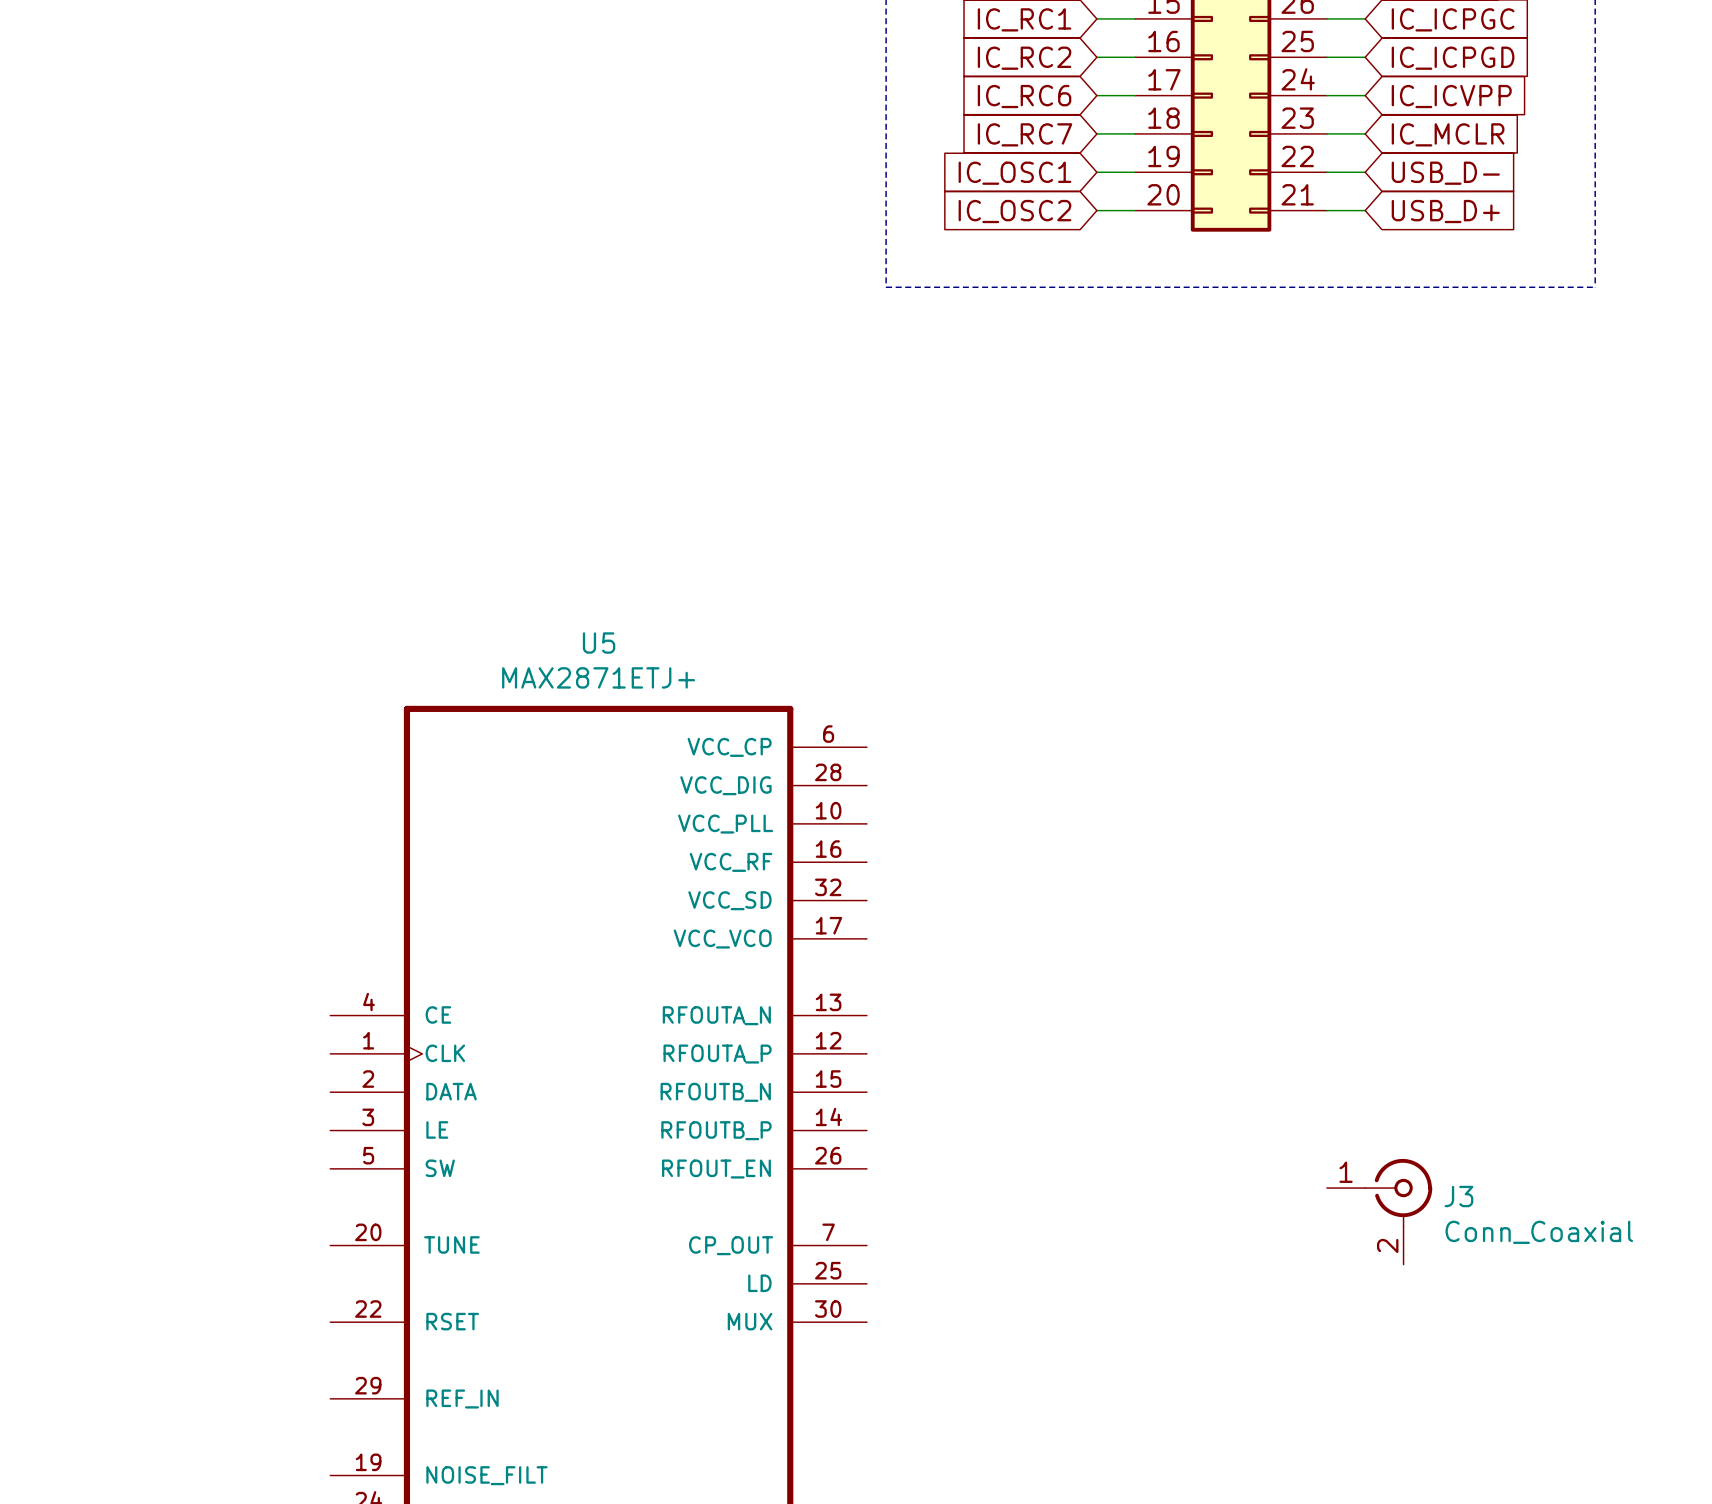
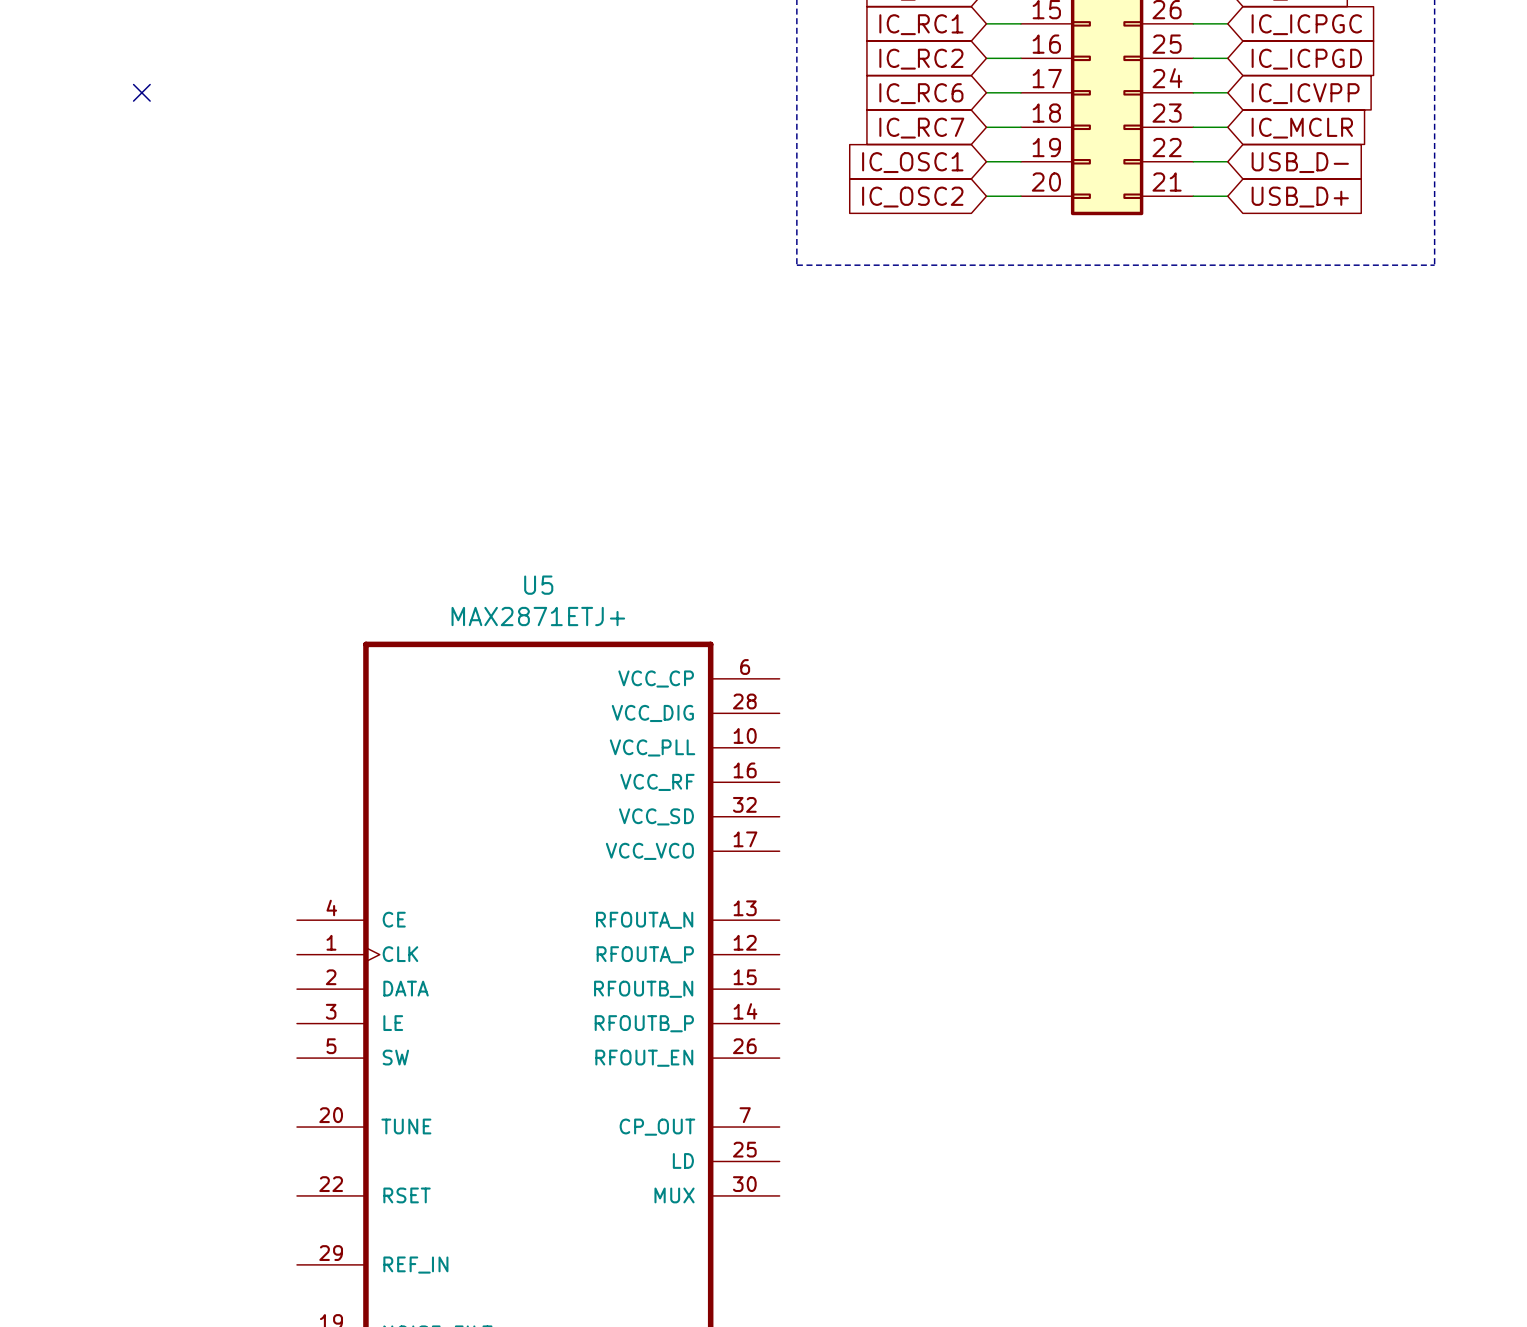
no-connect mark: none -> (141, 92)
J3: Conn_Coaxial (1379, 1211) -> none

